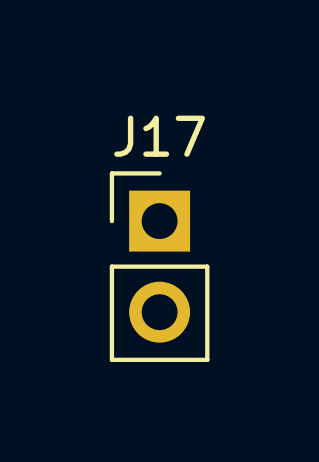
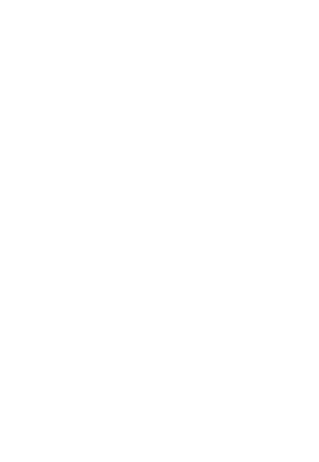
J17: (159, 266) -> none

